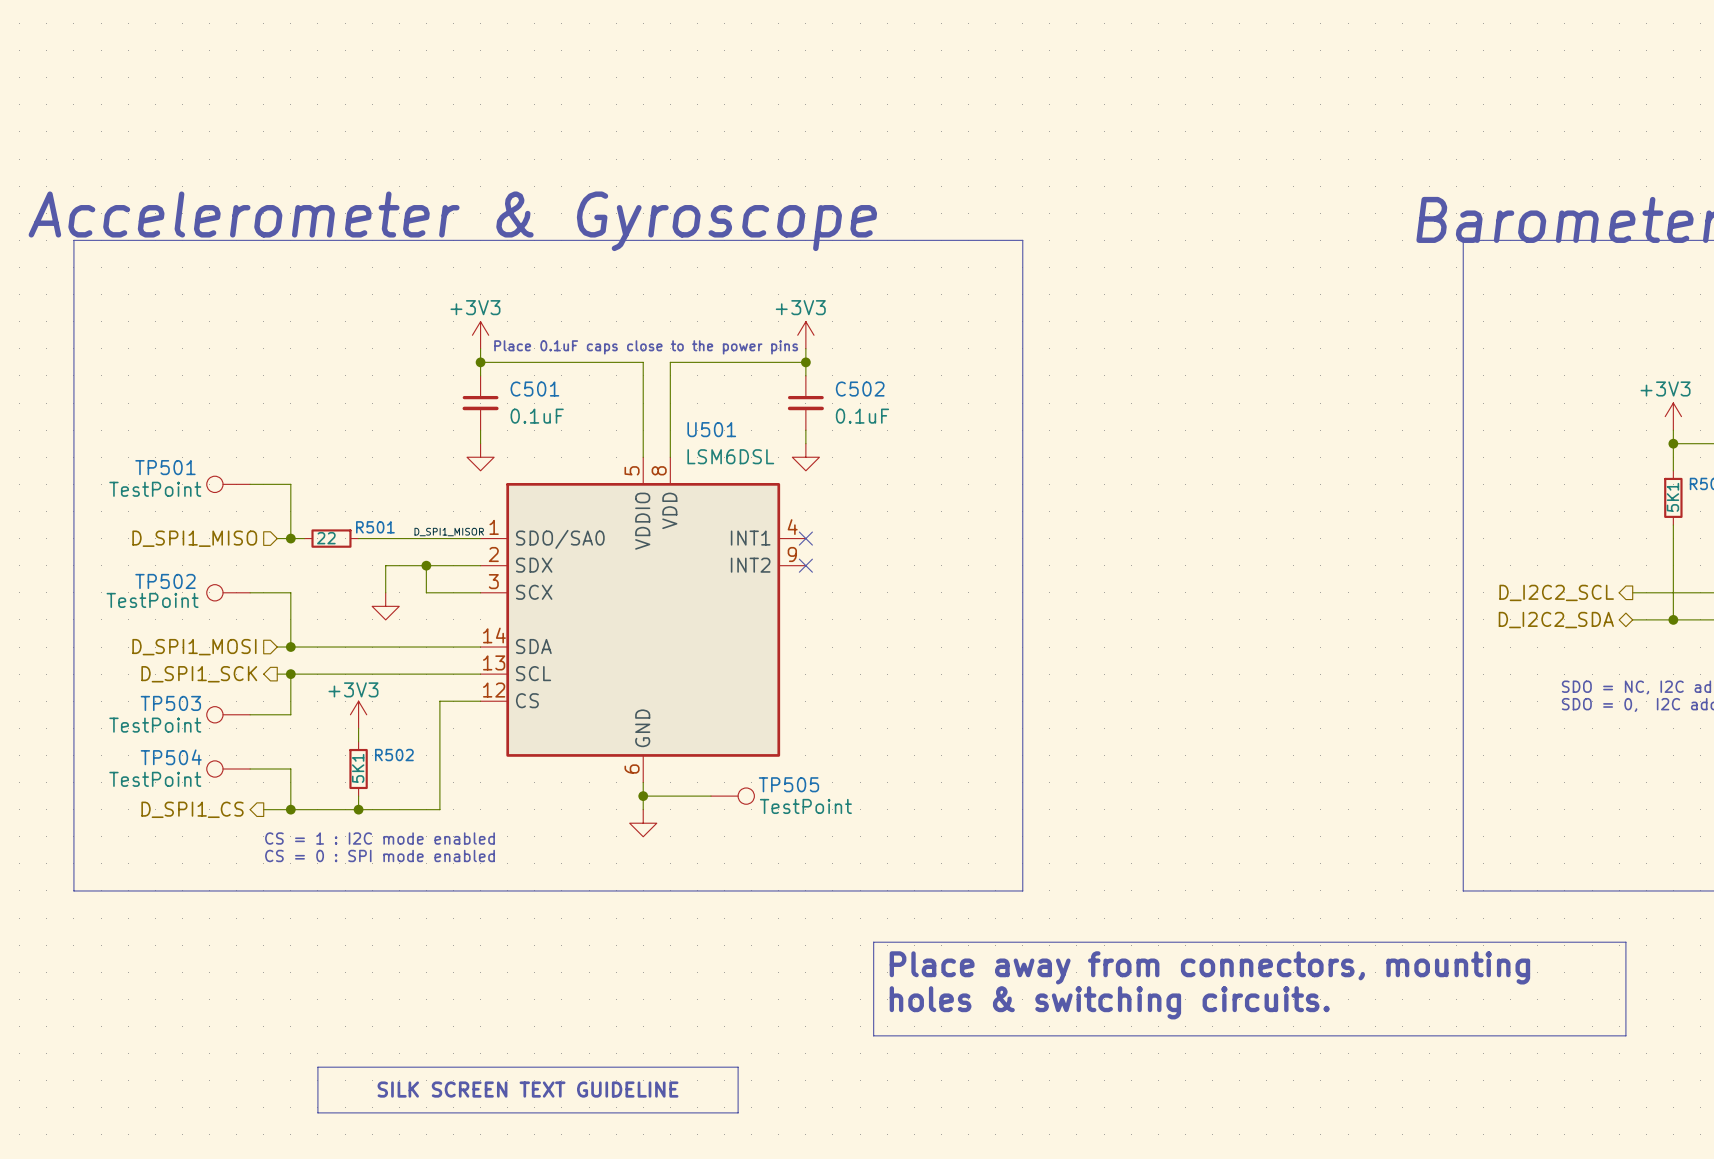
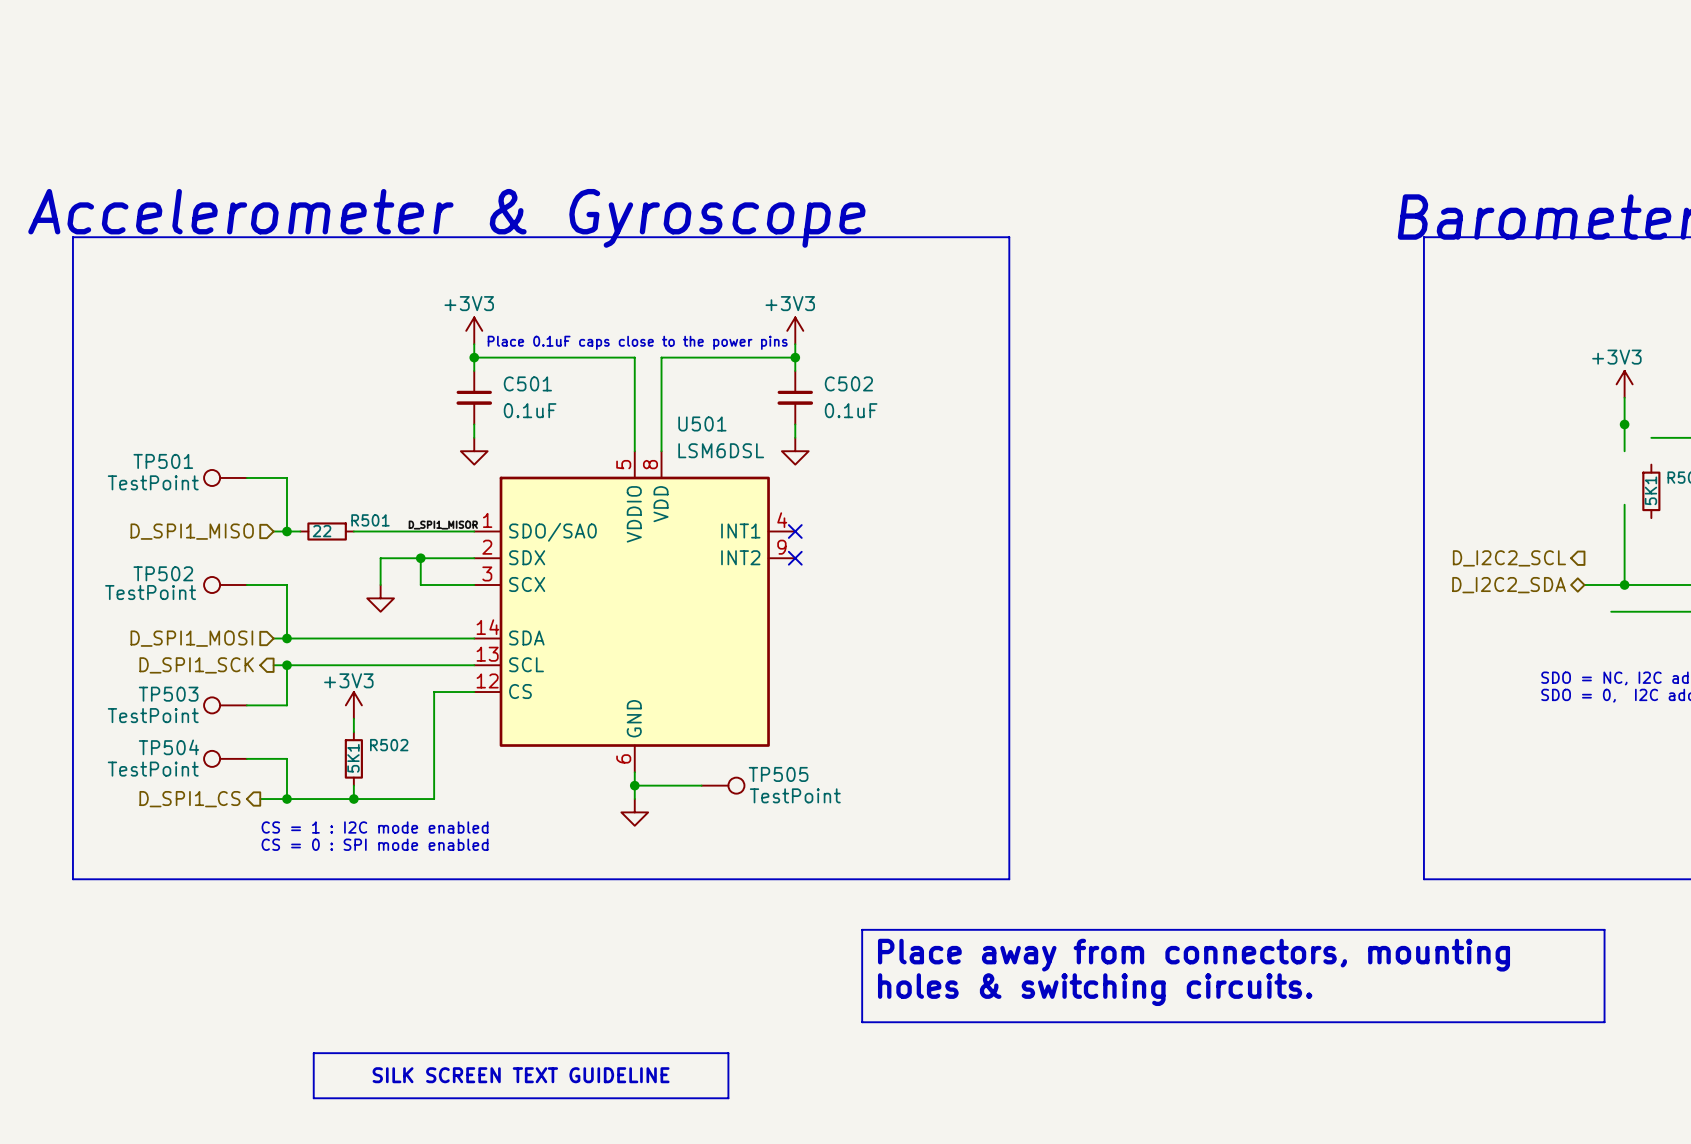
line: (1463, 240) (1463, 890) -> (1444, 237) (1423, 237) (1423, 879) (1444, 879)
wire: none -> (1624, 397) (1624, 451)
power symbol position: +3V3 (1673, 416) -> +3V3 (1624, 384)
wire: (1673, 430) (1673, 470) -> none
junction position: (1673, 443) -> (1624, 424)
wire: none -> (1624, 504) (1624, 585)
wire: (1673, 525) (1673, 619) -> none
hierarchical label position: D_I2C2_SCL (1556, 592) -> D_I2C2_SCL (1509, 558)
wire: none -> (1584, 585) (1611, 585)
junction: none -> (1624, 585)
junction: (1673, 619) -> none
hierarchical label position: D_I2C2_SDA (1556, 620) -> D_I2C2_SDA (1509, 585)

